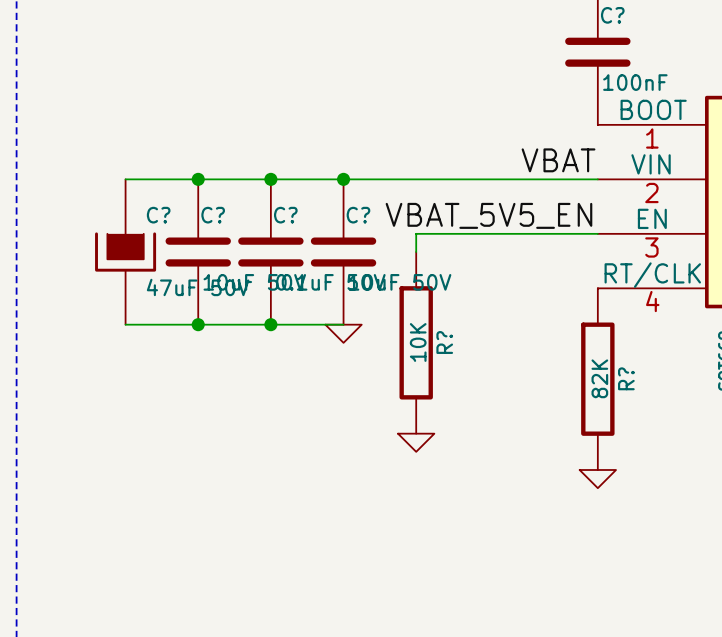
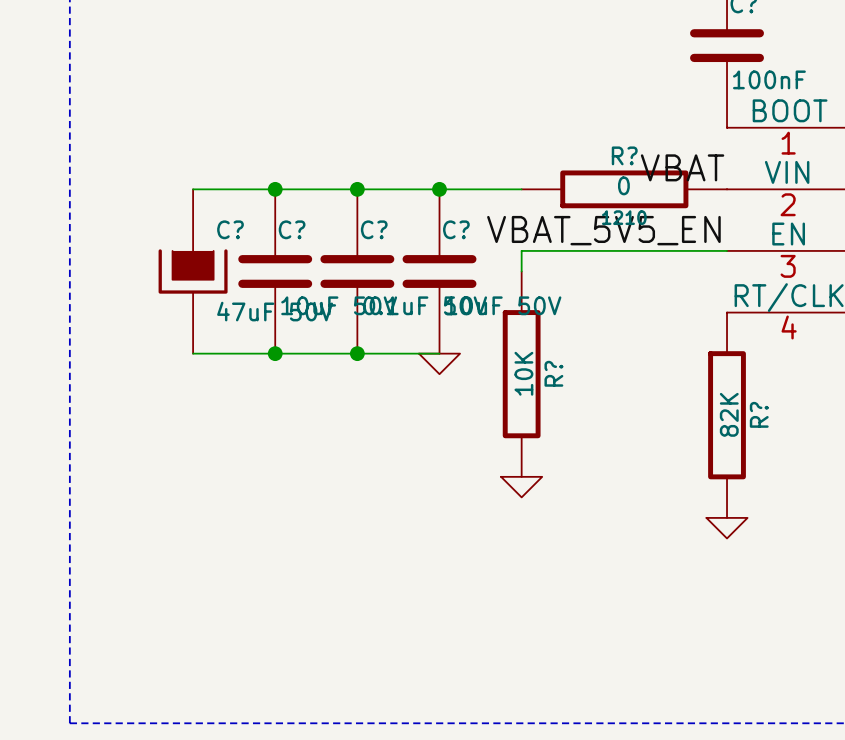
wire: (416, 179) (597, 179) -> none
R?: none -> 0 (624, 189)

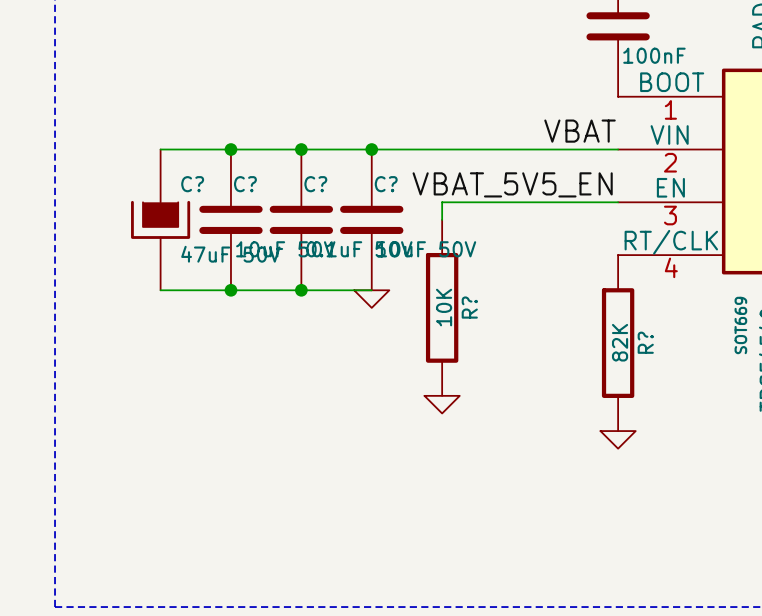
wire: none -> (442, 149) (618, 149)
R?: 0 (624, 189) -> none

